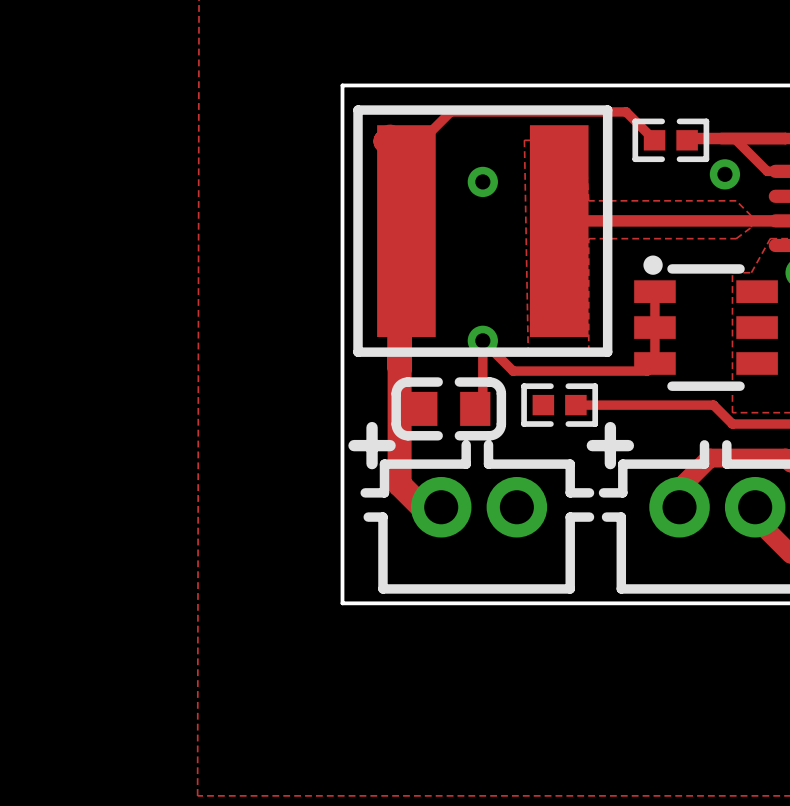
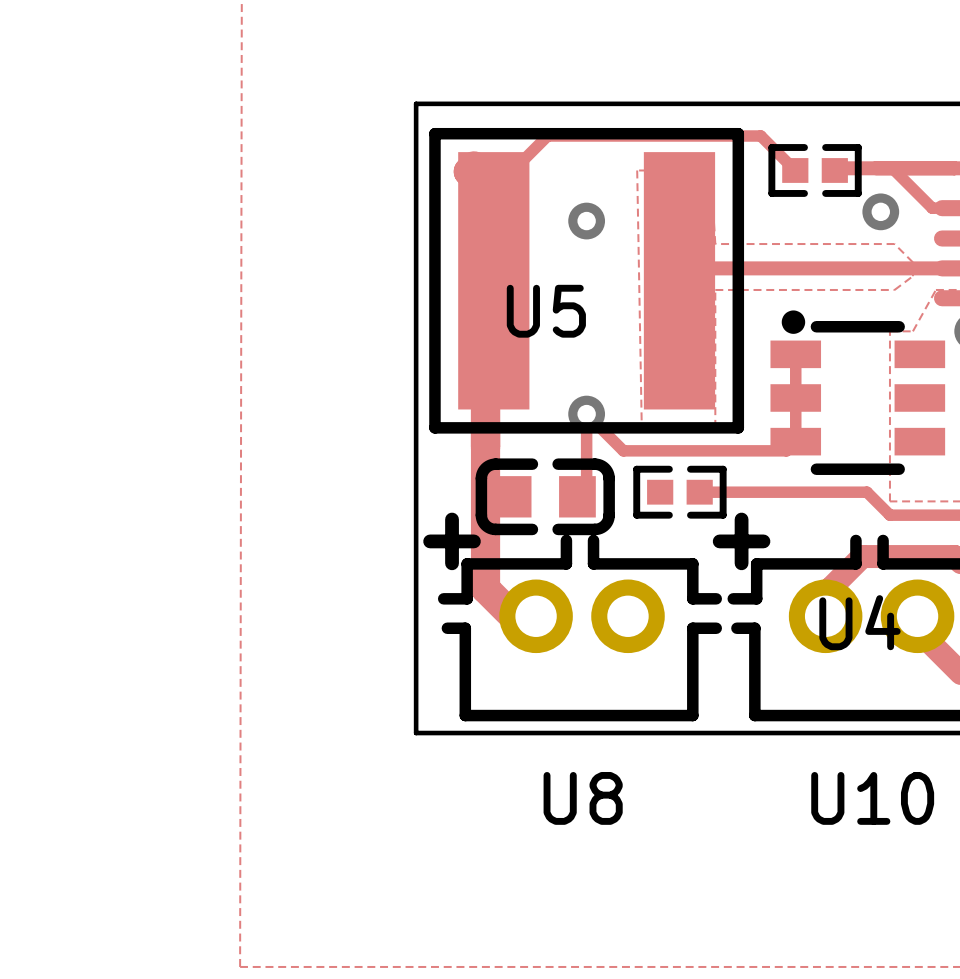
U5 name: none -> U5 (546, 311)
U4 name: none -> U4 (859, 622)
U8 name: none -> U8 (583, 798)
U10 name: none -> U10 (872, 798)

